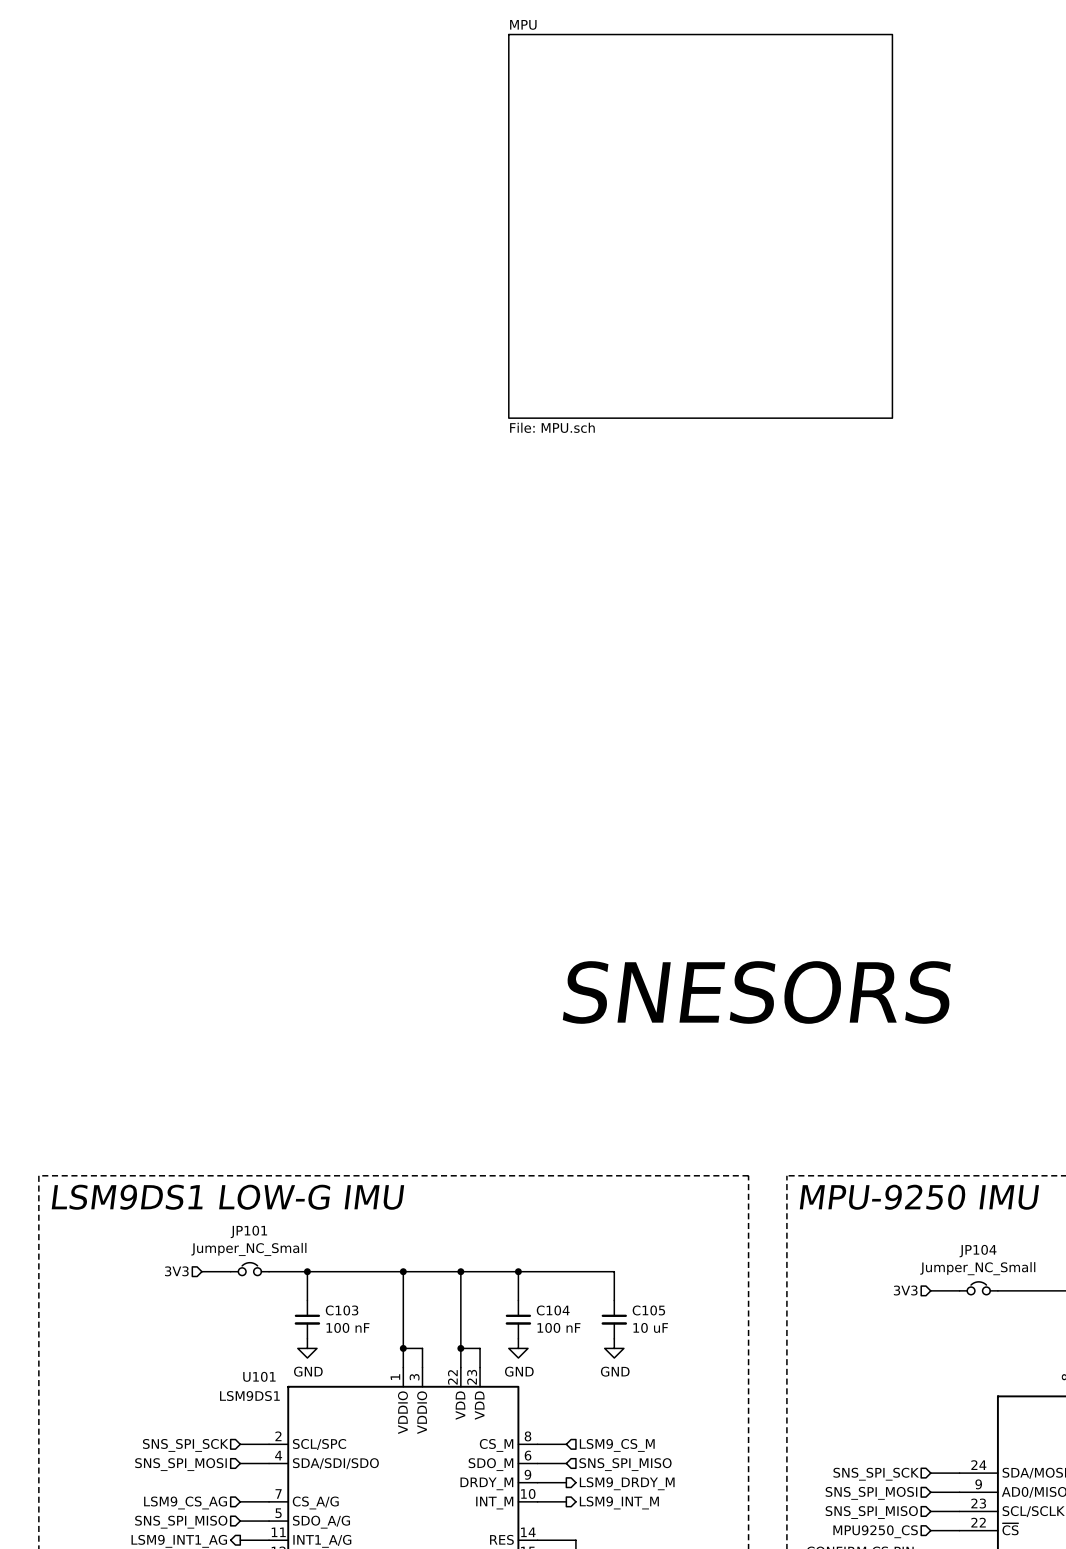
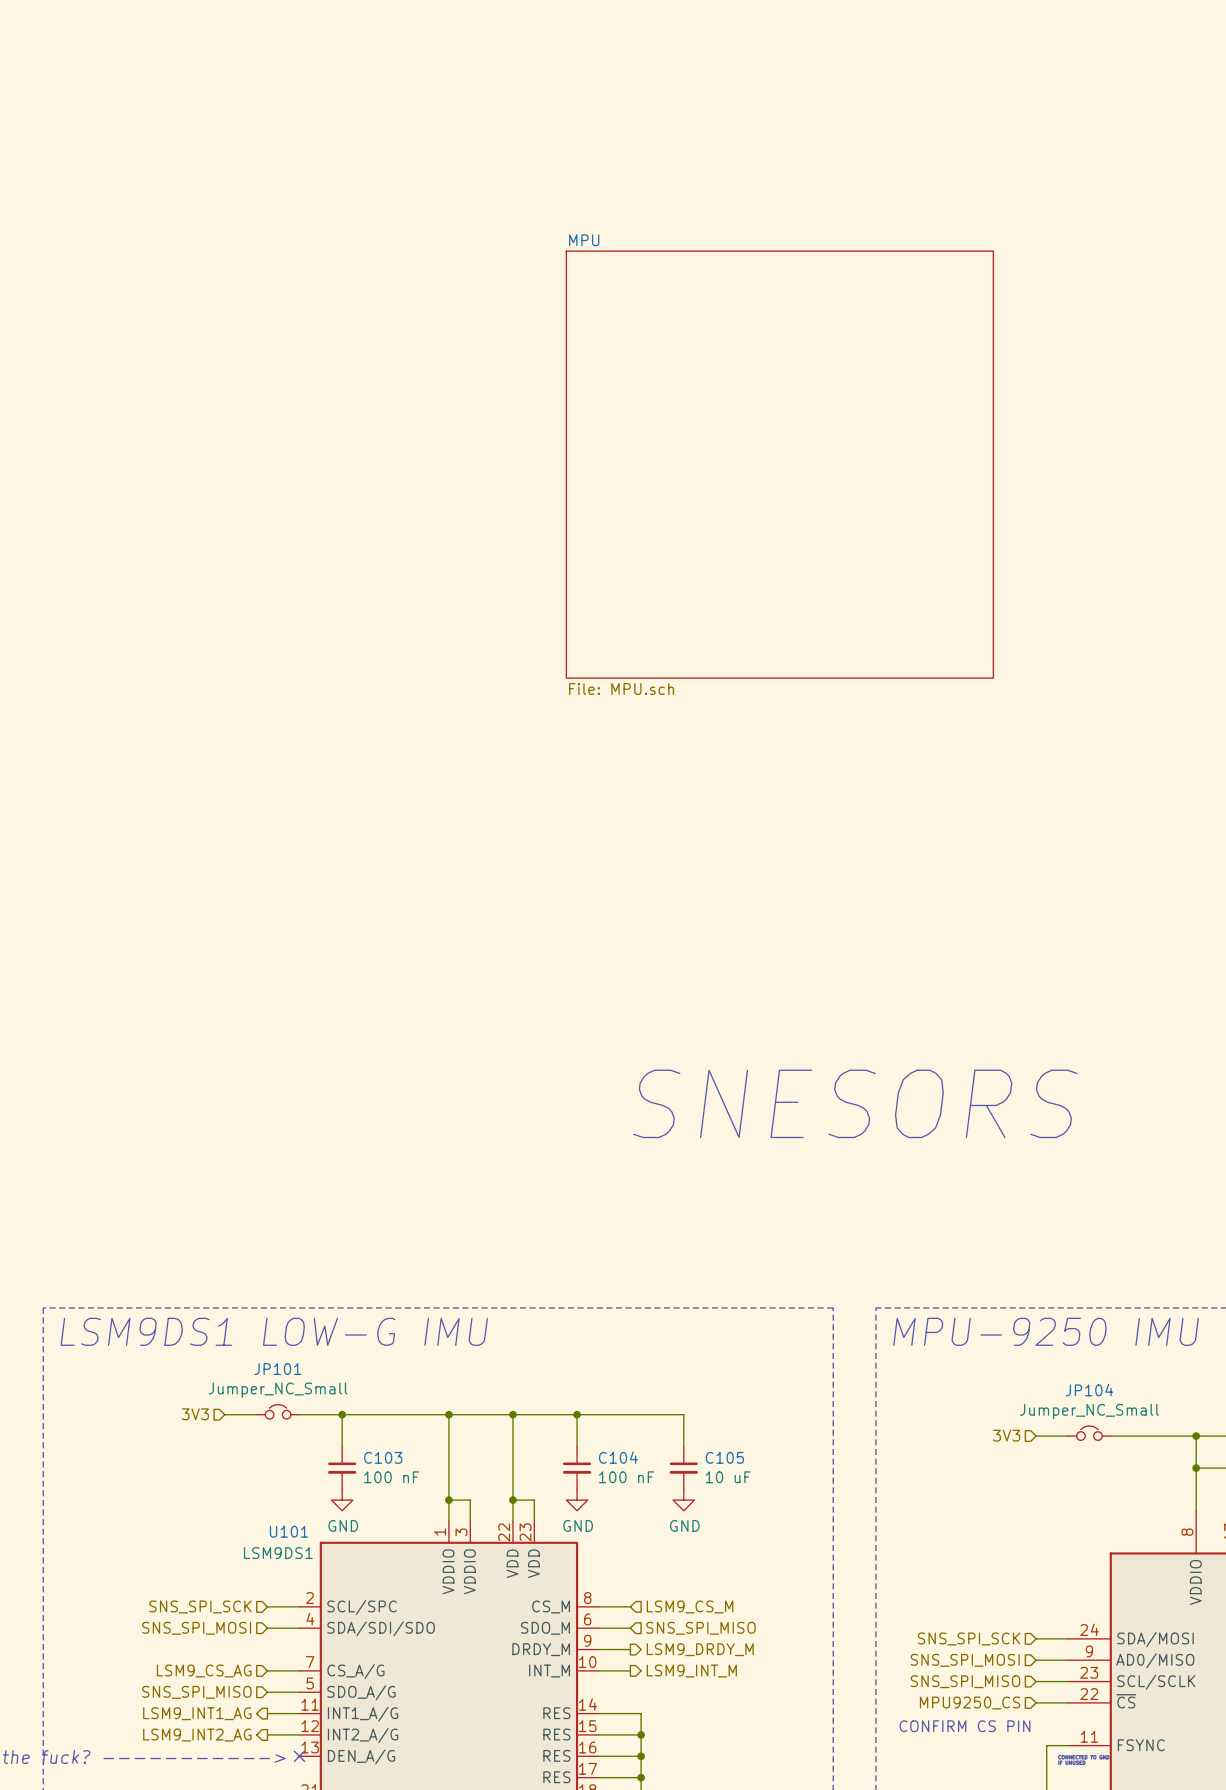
sheet MPU: File: MPU.sch (700, 226) -> none
sheet MPU: none -> File: MPU.sch (779, 464)

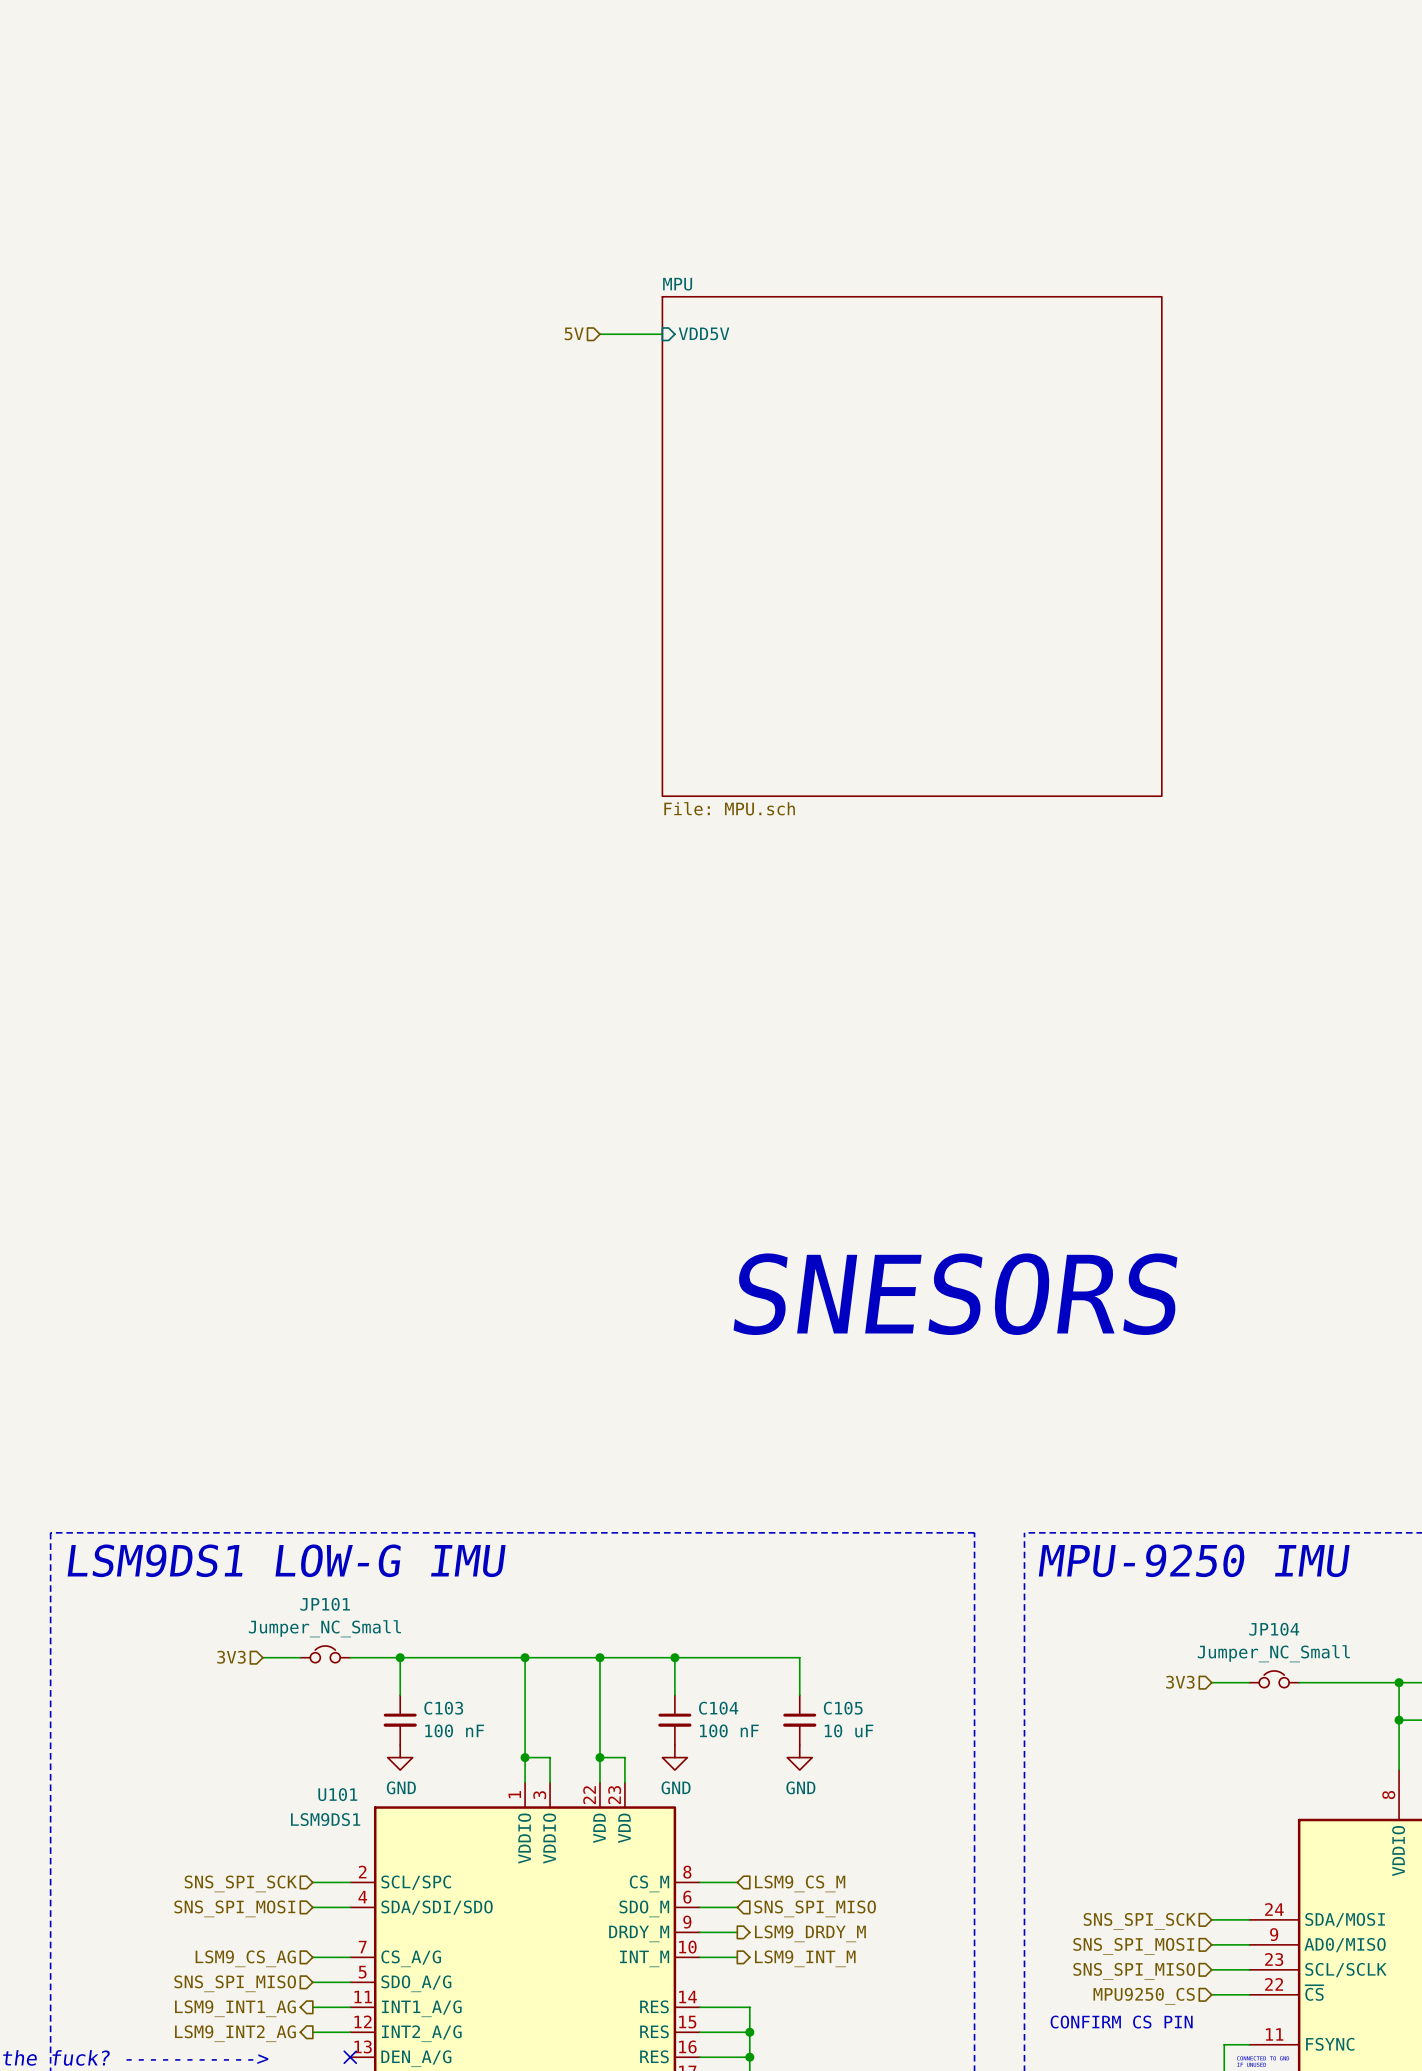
hierarchical label: none -> 5V (574, 333)
sheet pin: none -> VDD5V (704, 333)
wire: none -> (599, 334) (662, 334)

